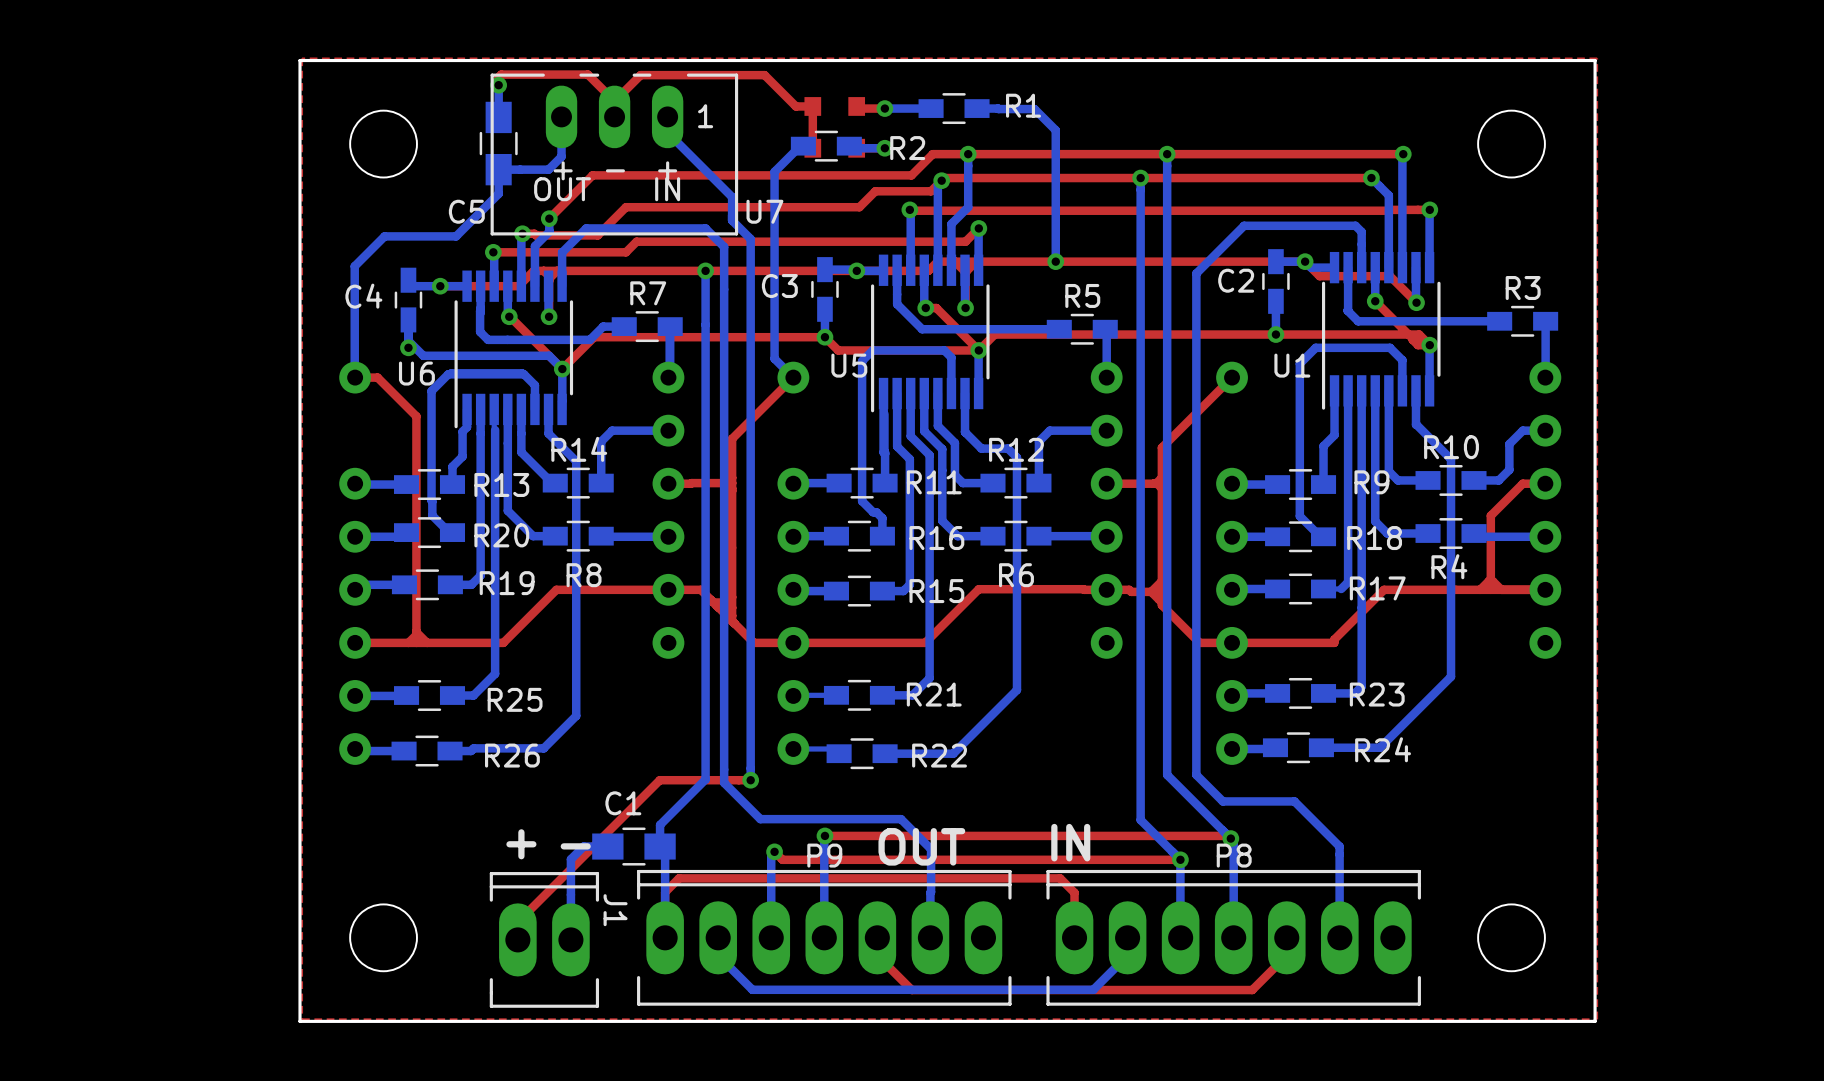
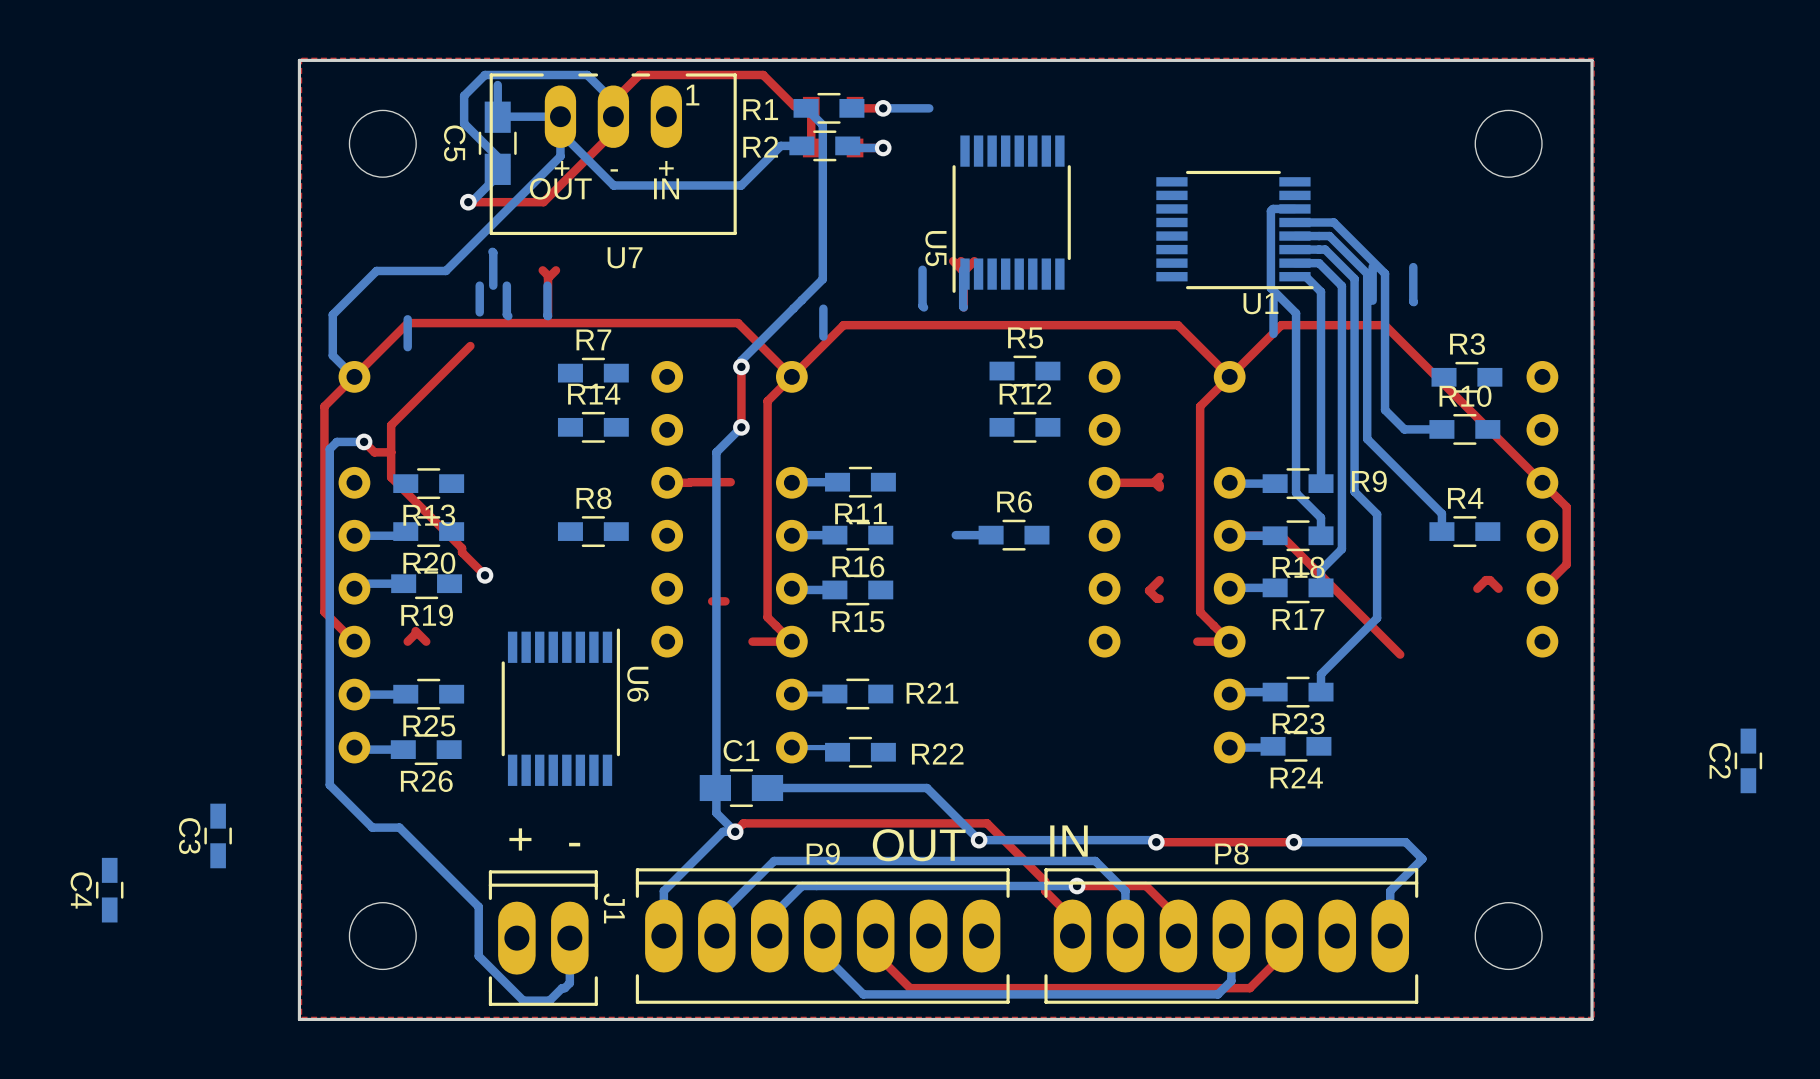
top track: (498, 85) (498, 77) (501, 74) (587, 74) (614, 101) -> none
via: (498, 85) -> none
R1 name position: R1 (1023, 105) -> R1 (760, 109)
bottom track: none -> (806, 108) (822, 125) (822, 279) (741, 360) (741, 366)
R1 position: (954, 108) -> (828, 108)
bottom track: (977, 108) (1034, 109) (1055, 130) (1055, 261) -> none
bottom track: none -> (505, 115) (560, 116)
top track: none -> (613, 116) (613, 132) (543, 202) (468, 202)
bottom track: none -> (613, 116) (613, 101) (587, 75) (484, 75) (464, 95) (464, 123) (505, 165) (505, 167) (471, 202) (468, 202)
bottom track: (667, 116) (667, 132) (732, 197) (732, 220) (750, 239) (750, 780) -> none
U7 text position: 1 (705, 116) -> 1 (692, 95)
bottom track: (800, 146) (774, 171) (774, 358) (793, 377) -> (798, 145) (780, 145) (741, 185) (613, 185) (560, 132)
R2 name position: R2 (907, 148) -> R2 (760, 147)
bottom track: (968, 154) (968, 207) (951, 223) (951, 270) -> none
via: (968, 154) -> none
bottom track: (1167, 154) (1167, 774) (1233, 841) (1233, 937) -> none
via: (1167, 154) -> none
top track: (1403, 154) (932, 154) (911, 175) (592, 175) (549, 218) -> none
bottom track: (1403, 154) (1402, 267) -> none
via: (1403, 154) -> none
bottom track: (548, 169) (498, 169) (498, 193) (456, 236) (384, 236) (354, 266) (354, 377) -> (547, 169) (445, 270) (376, 270) (332, 314) (332, 355) (354, 376)
bottom track: (1140, 178) (1140, 820) (1180, 859) (1180, 937) -> none
via: (1140, 178) -> none
top track: (1371, 178) (944, 178) (931, 191) (875, 191) (859, 207) (626, 207) (597, 235) (522, 233) -> none
bottom track: (1371, 178) (1388, 195) (1388, 267) -> none
via: (1371, 178) -> none
bottom track: (941, 180) (937, 184) (937, 270) -> none
via: (941, 180) -> none
via: none -> (468, 202)
bottom track: (909, 209) (910, 270) -> none
via: (909, 209) -> none
top track: (1429, 209) (909, 209) -> none
via: (1429, 209) -> none
bottom track: (1429, 210) (1429, 267) -> none
C5 name rotation: 0° (466, 211) -> 90° clockwise (454, 143)
C5 name position: C5 (466, 211) -> C5 (454, 143)
U7 name position: U7 (764, 211) -> U7 (625, 257)
bottom track: (549, 218) (549, 231) (534, 246) (534, 286) -> none
via: (549, 218) -> none
bottom track: none -> (1294, 222) (1333, 222) (1385, 273) (1385, 410) (1404, 429) (1441, 429)
top track: (978, 228) (965, 241) (636, 241) (626, 252) (493, 252) -> none
bottom track: (978, 228) (978, 270) -> none
via: (978, 228) -> none
bottom track: (522, 233) (521, 286) -> none
via: (522, 233) -> none
bottom track: none -> (1294, 236) (1329, 236) (1367, 273) (1367, 439) (1441, 513) (1441, 531)
via: (493, 252) -> none
via: (1055, 261) -> none
bottom track: (1275, 261) (1305, 261) (1311, 267) (1334, 267) -> none
via: (1305, 261) -> none
bottom track: (1348, 267) (1347, 310) (1358, 321) (1499, 321) -> none
bottom track: (1361, 267) (1361, 231) (1355, 225) (1244, 225) (1196, 273) (1196, 774) (1222, 801) (1294, 801) (1339, 846) (1339, 919) -> none
bottom track: (824, 269) (883, 270) -> none
bottom track: (705, 270) (705, 779) (660, 824) (660, 846) (665, 851) (665, 892) -> (735, 831) (723, 831) (663, 891)
via: (705, 270) -> none
via: (856, 270) -> none
bottom track: (897, 270) (897, 304) (922, 329) (1059, 329) -> none
bottom track: (408, 280) (414, 286) (467, 286) -> none
C2 name rotation: 0° (1236, 280) -> 90° clockwise (1720, 760)
C2 position: (1275, 281) -> (1748, 760)
top track: (440, 286) (518, 286) (533, 270) (928, 270) (937, 261) (1305, 261) (1319, 276) (1390, 276) (1416, 302) -> none
via: (440, 286) -> none
bottom track: (562, 286) (562, 252) (586, 228) (705, 228) (724, 247) (724, 782) (760, 819) (901, 819) (931, 849) (930, 937) -> none
C3 name rotation: 0° (779, 286) -> 90° clockwise (189, 836)
C3 position: (824, 289) -> (218, 835)
C4 name rotation: 0° (363, 296) -> 90° clockwise (81, 890)
C4 position: (408, 300) -> (109, 890)
top track: (1375, 301) (1412, 338) (1417, 345) (1429, 345) (1419, 334) (994, 334) (978, 350) -> none
via: (1375, 301) -> none
via: (1416, 302) -> none
top track: (925, 308) (936, 308) (978, 350) -> none
via: (925, 308) -> none
via: (965, 308) -> none
bottom track: (480, 310) (480, 331) (488, 339) (589, 339) (603, 326) (624, 326) -> none
top track: (509, 316) (562, 369) (594, 337) (824, 337) (838, 350) (978, 350) -> none
via: (509, 316) -> none
via: (549, 316) -> none
R3 position: (1522, 321) -> (1466, 377)
bottom track: (1545, 321) (1545, 377) -> none
R7 position: (647, 326) -> (593, 373)
R5 position: (1082, 329) -> (1024, 371)
bottom track: (1105, 329) (1106, 377) -> none
U1 rotation: 0° (1381, 330) -> 90° counterclockwise (1235, 230)
U1 position: (1381, 330) -> (1235, 230)
U5 position: (930, 333) -> (1011, 214)
via: (1275, 334) -> none
via: (824, 337) -> none
bottom track: (408, 340) (423, 355) (549, 355) (562, 369) (562, 400) -> none
bottom track: (1429, 345) (1429, 390) -> none
via: (1429, 345) -> none
top track: none -> (470, 346) (391, 425) (391, 477) (462, 548) (462, 552) (484, 575)
via: (408, 347) -> none
U6 rotation: 0° (513, 349) -> 180° (560, 707)
U6 position: (513, 349) -> (560, 707)
bottom track: (978, 350) (978, 393) -> none
via: (978, 350) -> none
U5 name rotation: 0° (849, 365) -> 90° clockwise (935, 248)
top track: none -> (741, 366) (741, 427)
via: none -> (741, 366)
via: (562, 369) -> none
bottom track: (445, 376) (450, 371) (522, 371) (534, 384) (534, 409) (534, 385) (524, 374) (448, 374) (431, 391) (432, 515) (449, 532) (452, 532) -> none
top track: (355, 377) (377, 377) (416, 416) (416, 642) -> none
bottom track: (668, 377) (670, 375) (670, 326) (668, 328) (668, 377) -> none
bottom track: (1334, 390) (1334, 435) (1323, 446) -> (1294, 276) (1305, 276) (1321, 291) (1321, 445)
bottom track: (1348, 390) (1348, 582) (1341, 588) (1323, 588) -> (1294, 263) (1319, 263) (1341, 286) (1341, 549) (1321, 570) (1321, 587)
bottom track: (1361, 390) (1361, 686) (1354, 693) (1323, 693) -> (1294, 249) (1325, 249) (1354, 278) (1354, 491) (1377, 514) (1377, 618) (1321, 674) (1321, 692)
bottom track: (1375, 390) (1375, 521) (1387, 533) (1428, 533) -> none
bottom track: (1388, 390) (1388, 471) (1397, 480) (1428, 480) -> none
bottom track: (1402, 390) (1402, 360) (1390, 347) (1315, 347) (1299, 363) (1299, 516) (1320, 536) (1323, 536) -> (1294, 208) (1273, 208) (1270, 211) (1270, 288) (1296, 313) (1296, 492) (1321, 517) (1321, 535)
bottom track: (1415, 390) (1415, 424) (1451, 459) (1451, 676) (1380, 747) (1321, 747) -> none
bottom track: (897, 393) (897, 446) (909, 459) (909, 584) (903, 591) (882, 591) -> none
bottom track: (910, 393) (910, 436) (929, 455) (929, 678) (912, 695) (882, 695) -> none
bottom track: (924, 393) (924, 431) (942, 449) (942, 520) (957, 536) (997, 536) -> none
bottom track: (937, 393) (937, 425) (954, 443) (954, 475) (962, 483) (992, 483) -> none
bottom track: (951, 393) (951, 357) (944, 350) (872, 350) (862, 361) (862, 501) (882, 518) (882, 536) -> none
bottom track: (965, 393) (965, 432) (981, 448) -> none
top track: (769, 401) (732, 438) (732, 621) -> (767, 401) (767, 617) (791, 641)
top track: (1202, 407) (1161, 447) (1161, 605) (1199, 642) -> (1200, 406) (1200, 612) (1229, 641)
bottom track: (467, 409) (467, 427) (462, 431) (462, 456) (452, 466) (452, 484) -> none
bottom track: (480, 409) (480, 575) (471, 584) (450, 584) -> none
bottom track: (507, 409) (507, 510) (533, 536) (555, 536) -> none
bottom track: (521, 409) (521, 452) (552, 483) (555, 483) -> none
bottom track: (548, 409) (548, 433) (576, 461) (576, 715) (543, 748) (473, 748) (471, 751) (450, 751) -> none
bottom track: (884, 414) (884, 451) (885, 452) (885, 483) (885, 395) (883, 393) (883, 452) (885, 453) -> none
bottom track: none -> (741, 427) (716, 452) (716, 813) (735, 831)
via: none -> (741, 427)
bottom track: (495, 430) (495, 673) (473, 695) (452, 695) (455, 695) -> none
bottom track: (668, 430) (612, 430) (601, 441) (601, 483) -> none
bottom track: (1106, 430) (1049, 430) (1038, 441) (1038, 483) -> none
bottom track: (1545, 430) (1522, 430) (1509, 444) (1509, 469) (1498, 480) (1474, 480) -> none
top track: none -> (364, 441) (374, 452) (391, 452)
via: none -> (364, 441)
bottom track: (981, 448) (1008, 448) (1016, 457) (1016, 690) (953, 753) (885, 753) -> none
R10 position: (1451, 480) -> (1464, 429)
R11 name position: R11 (934, 482) -> R11 (860, 513)
bottom track: (355, 483) (406, 484) (354, 483) -> none
R14 position: (578, 483) -> (593, 427)
R12 position: (1015, 483) -> (1024, 427)
top track: (1545, 483) (1522, 483) (1490, 515) (1490, 589) -> none
R13 name position: R13 (501, 484) -> R13 (429, 515)
R4 position: (1451, 533) -> (1464, 531)
bottom track: (1474, 533) (1477, 536) (1545, 536) -> none
R20 name position: R20 (501, 535) -> R20 (429, 563)
R8 position: (578, 536) -> (593, 531)
bottom track: (668, 536) (601, 536) (601, 536) (667, 536) (668, 536) -> none
bottom track: (1038, 536) (1106, 536) -> none
top track: none -> (1229, 535) (1281, 535) (1400, 654)
R16 name position: R16 (936, 538) -> R16 (858, 566)
R18 name position: R18 (1374, 538) -> R18 (1298, 567)
R4 name position: R4 (1449, 566) -> R4 (1465, 498)
R8 name position: R8 (584, 575) -> R8 (593, 498)
R6 name position: R6 (1016, 575) -> R6 (1014, 501)
via: none -> (484, 575)
R19 name position: R19 (507, 583) -> R19 (427, 615)
R17 name position: R17 (1377, 588) -> R17 (1298, 619)
top track: (1545, 589) (1384, 589) (1334, 639) (1334, 642) (1232, 642) -> none
R15 name position: R15 (936, 591) -> R15 (858, 621)
top track: (1161, 591) (1131, 591) (1129, 589) (978, 589) (925, 642) (793, 642) -> none
top track: (753, 642) (700, 589) (556, 589) (503, 642) (355, 642) -> (1542, 588) (1566, 564) (1566, 507) (1384, 325) (1281, 325) (1229, 376) (1177, 325) (843, 325) (791, 376) (738, 323) (407, 323) (324, 406) (324, 612) (354, 641)
R23 name position: R23 (1377, 694) -> R23 (1298, 723)
R25 name position: R25 (515, 699) -> R25 (429, 725)
R24 name position: R24 (1383, 749) -> R24 (1296, 777)
R26 name position: R26 (512, 755) -> R26 (426, 781)
top track: (750, 780) (659, 780) (517, 922) (517, 939) -> none
via: (750, 780) -> none
bottom track: none -> (767, 788) (926, 788) (979, 840) (1154, 840) (1156, 842)
C1 name position: C1 (623, 803) -> C1 (741, 750)
via: none -> (735, 831)
top track: (824, 835) (1228, 835) (1230, 838) -> none
bottom track: (824, 835) (824, 937) -> (1231, 936) (1231, 981) (1217, 994) (863, 994) (822, 953) (822, 936)
via: (824, 835) -> none
via: (1230, 838) -> none
via: none -> (979, 840)
top track: none -> (1293, 842) (1156, 842)
bottom track: none -> (1293, 842) (1405, 842) (1422, 858) (1390, 891) (1390, 936)
via: none -> (1293, 842)
bottom track: (607, 846) (583, 846) (570, 859) (570, 939) -> (364, 441) (336, 441) (329, 449) (329, 784) (372, 827) (399, 827) (478, 906) (478, 956) (523, 1000) (549, 1000) (569, 983) (569, 938)
C1 position: (633, 846) -> (741, 788)
top track: (774, 851) (782, 859) (1180, 859) -> none
bottom track: (774, 851) (771, 855) (771, 920) -> (1077, 886) (802, 886) (769, 918)
via: (774, 851) -> none
via position: (1180, 859) -> (1156, 842)
top track: none -> (1077, 886) (1146, 886) (1178, 918) (1178, 936)
via: none -> (1077, 886)
top track: (1074, 920) (1074, 892) (1060, 878) (679, 878) (665, 892) (665, 937) -> (1072, 918) (1045, 891) (1045, 881) (987, 823) (743, 823) (735, 831)
bottom track: (1127, 937) (1127, 955) (1093, 989) (752, 989) (718, 955) (718, 937) -> (1125, 936) (1125, 891) (1095, 860) (774, 860) (716, 918) (716, 936)

